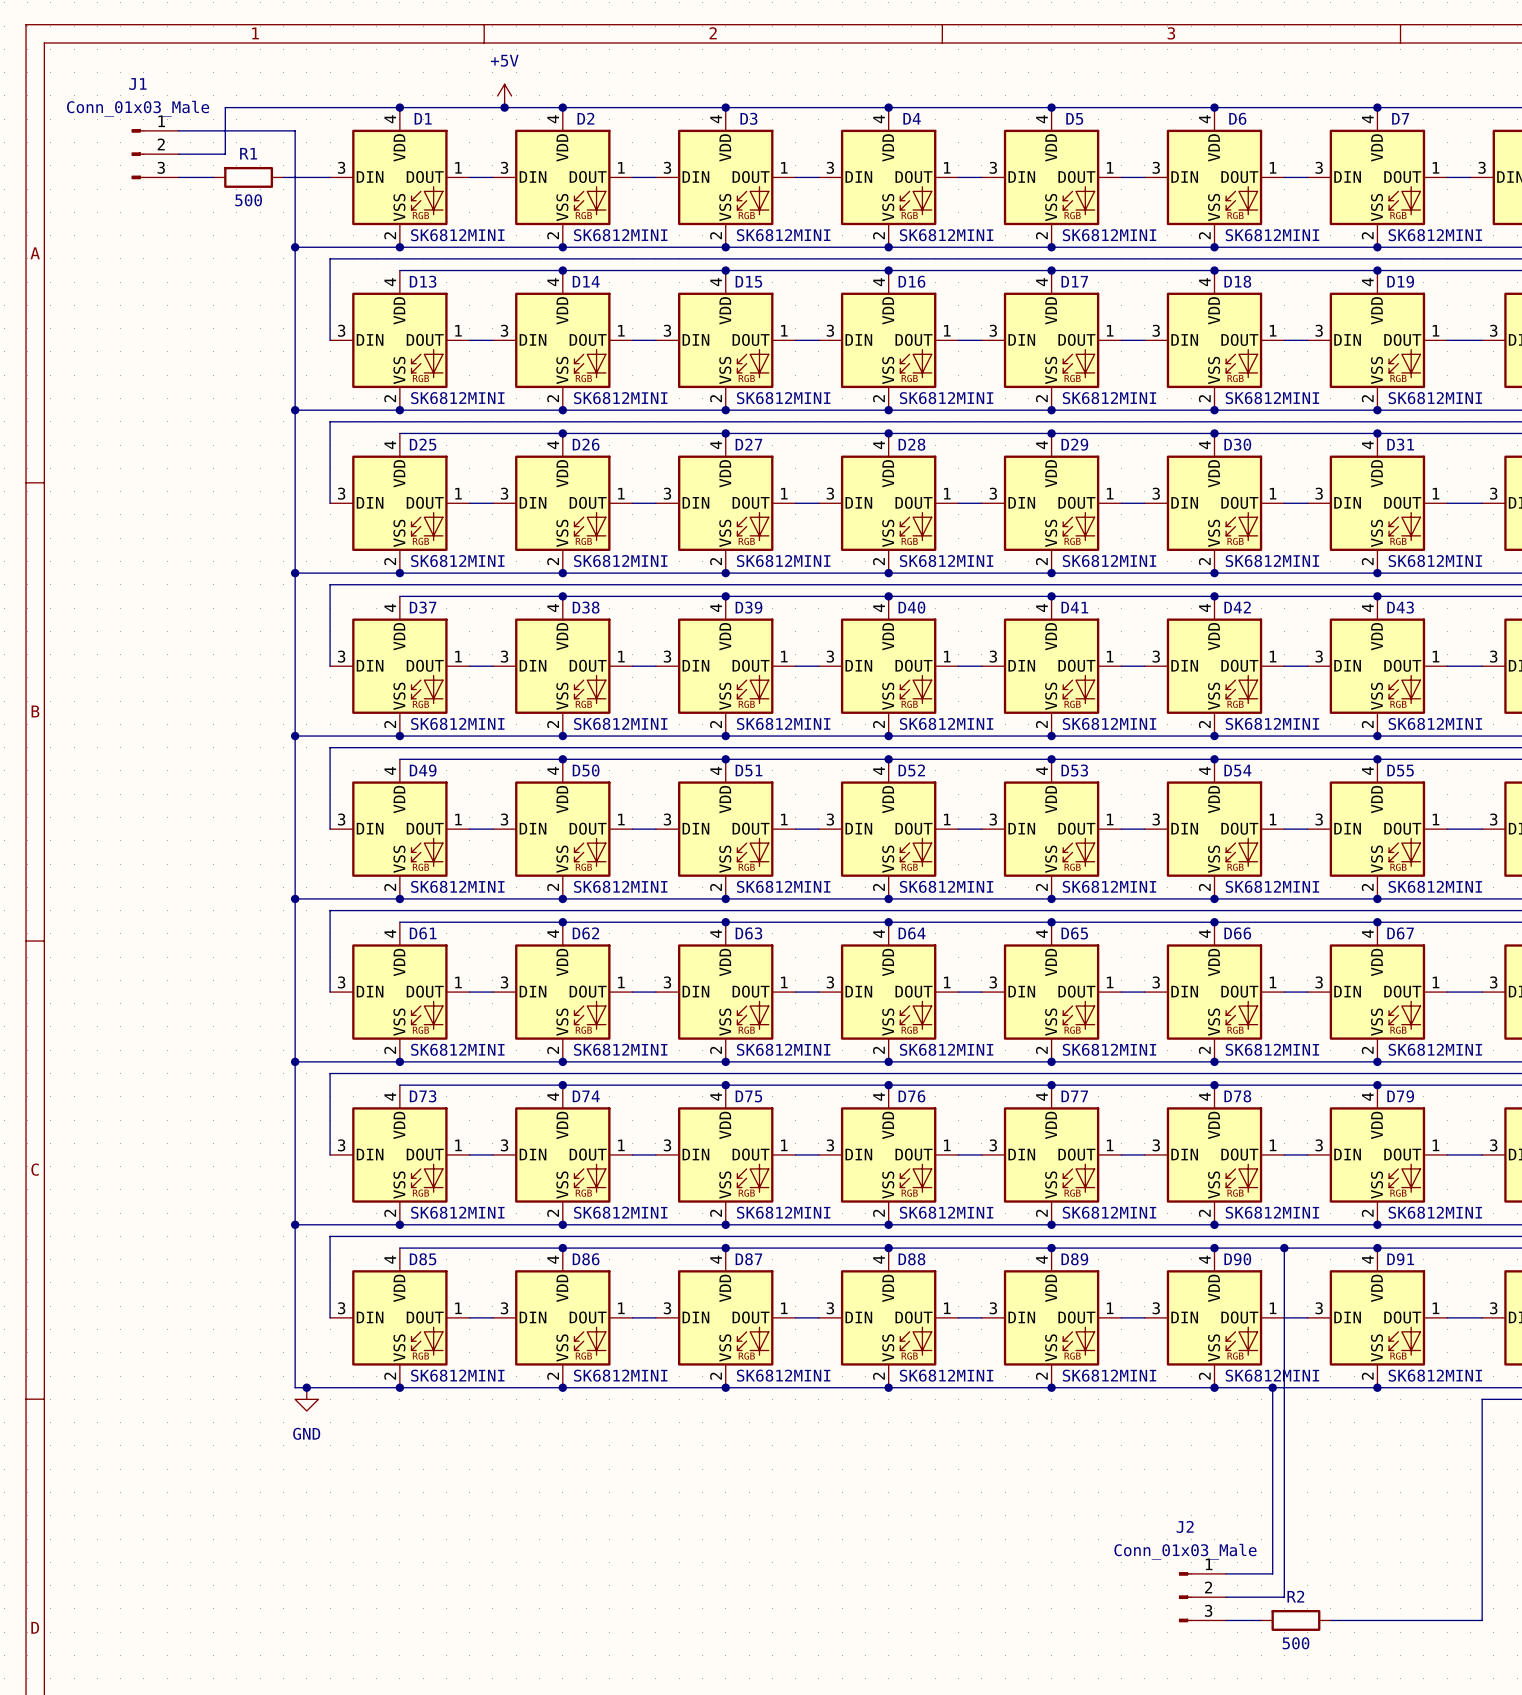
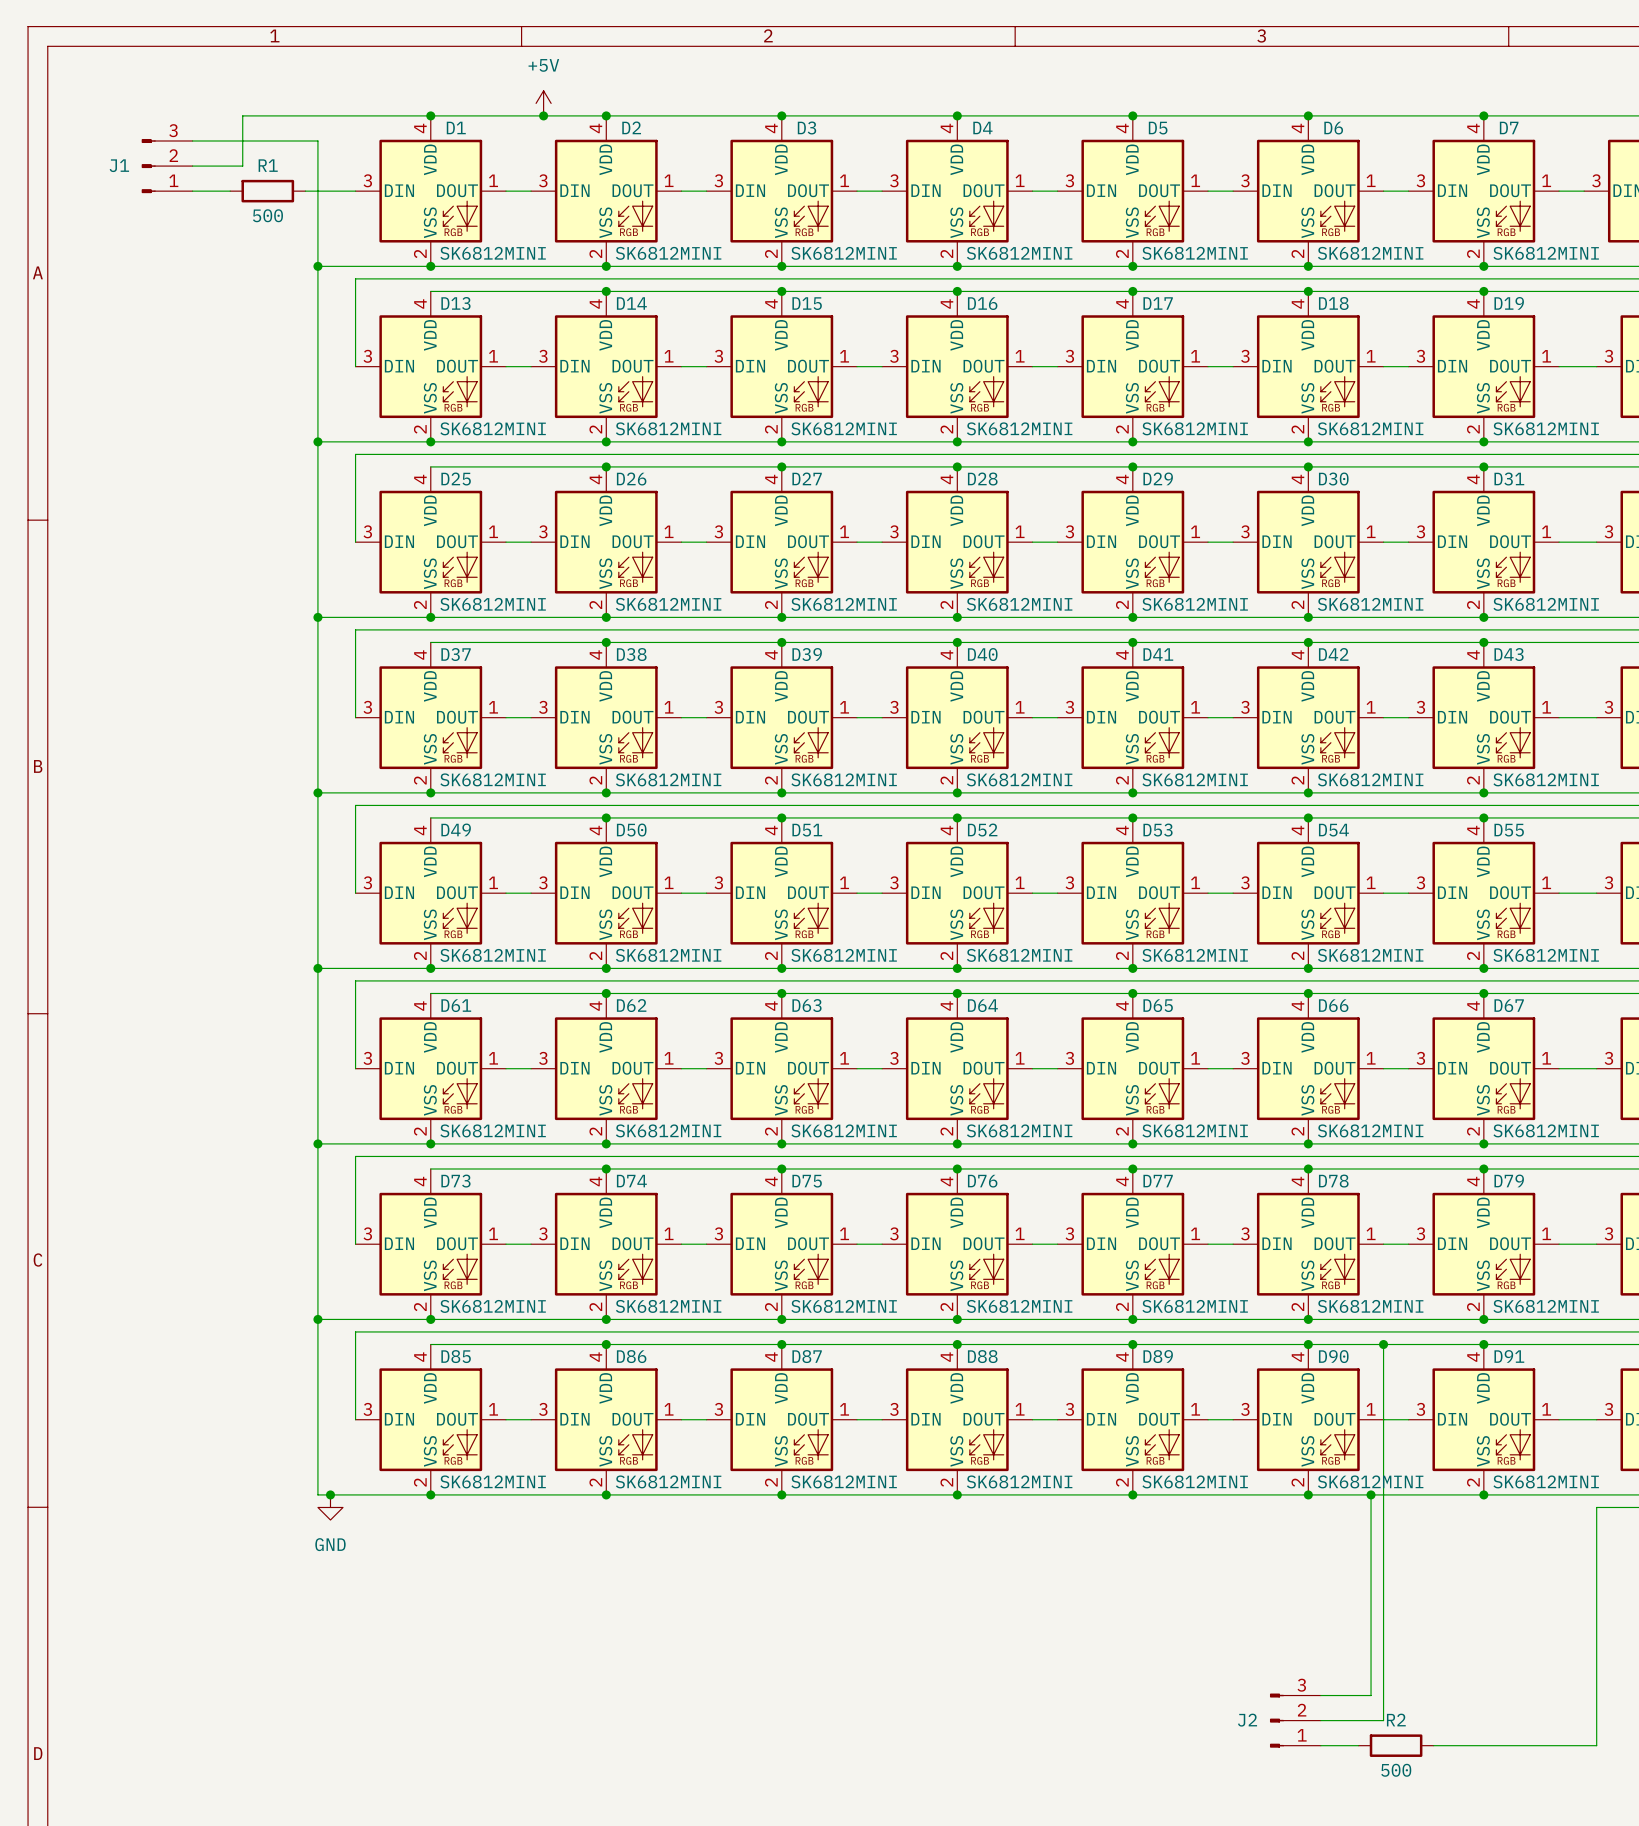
J1 name position: J1 (137, 84) -> J1 (119, 165)
J1 value: Conn_01x03_Male (138, 108) -> none
J1 flip: as is (138, 154) -> up-down (148, 166)
J2 name position: J2 (1185, 1526) -> J2 (1247, 1720)
J2 value: Conn_01x03_Male (1185, 1551) -> none
J2 flip: as is (1185, 1597) -> up-down (1276, 1720)

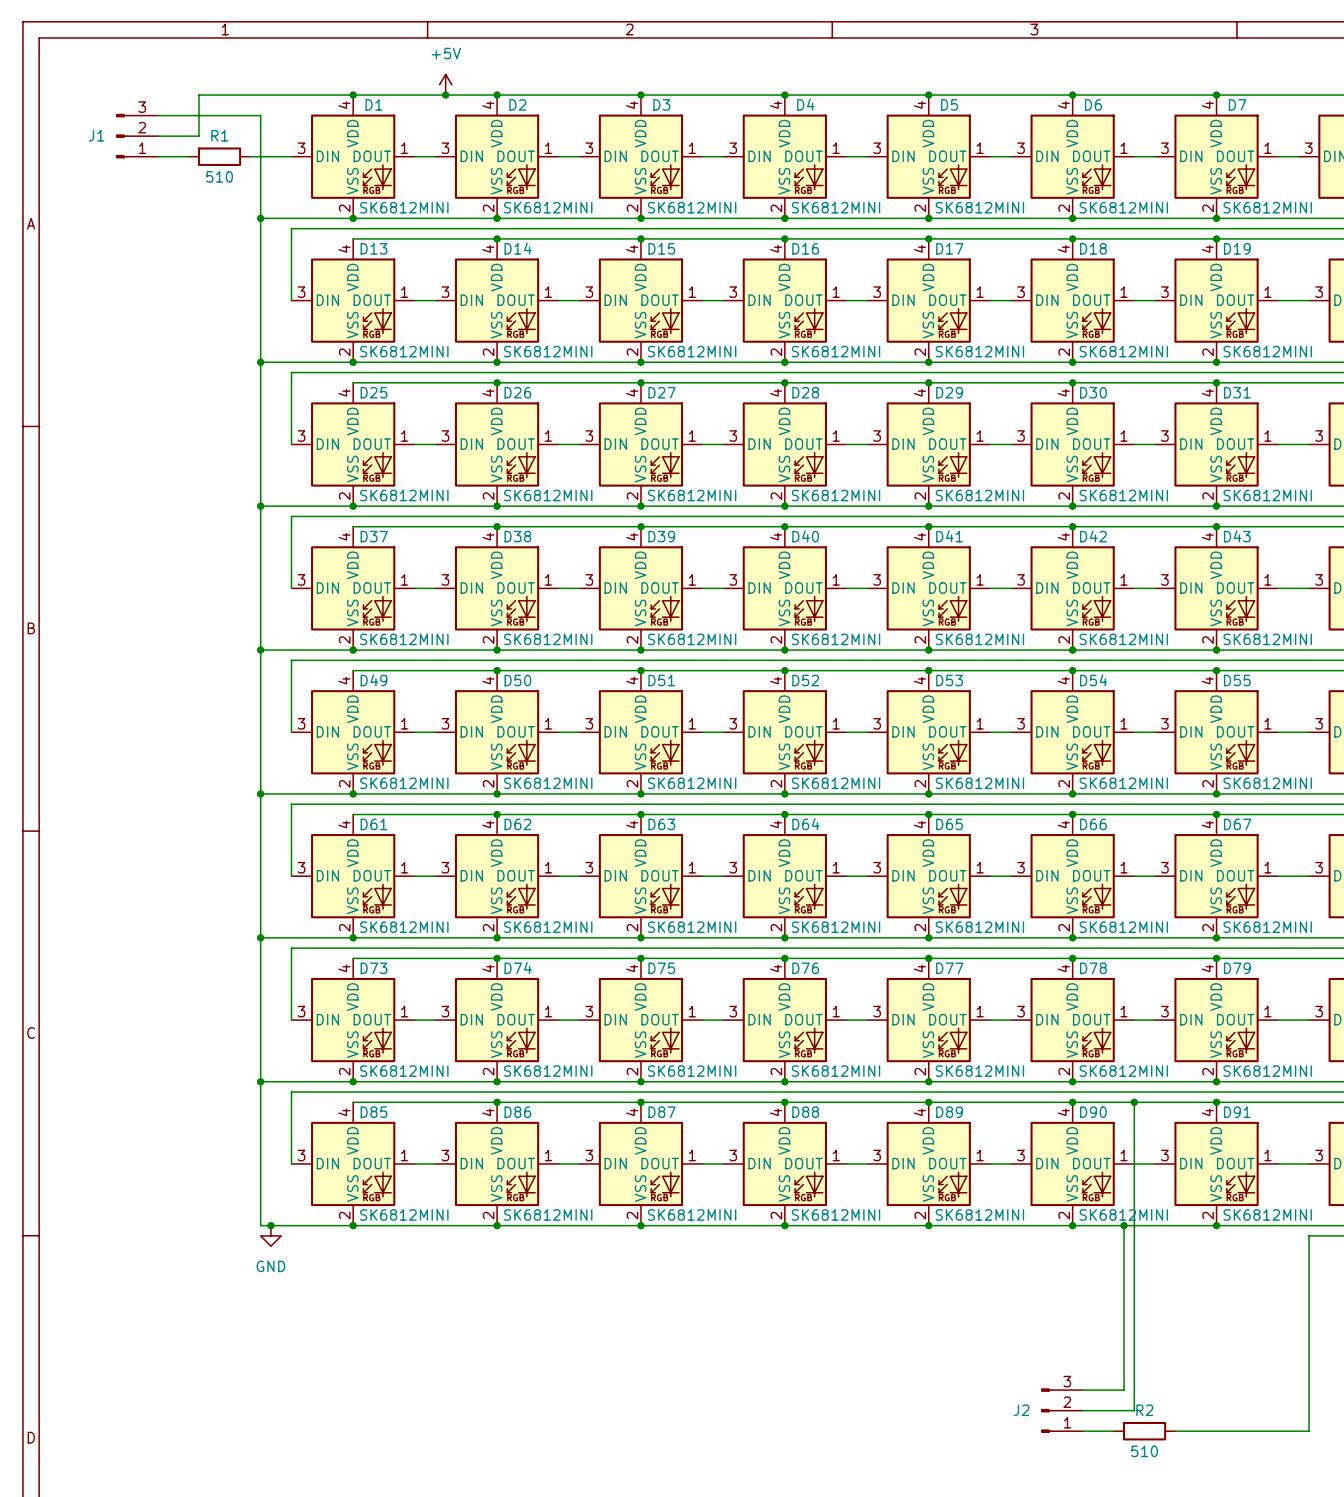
R1 value: 500 (267, 215) -> 510 (219, 176)
R2 value: 500 (1396, 1770) -> 510 (1144, 1451)

